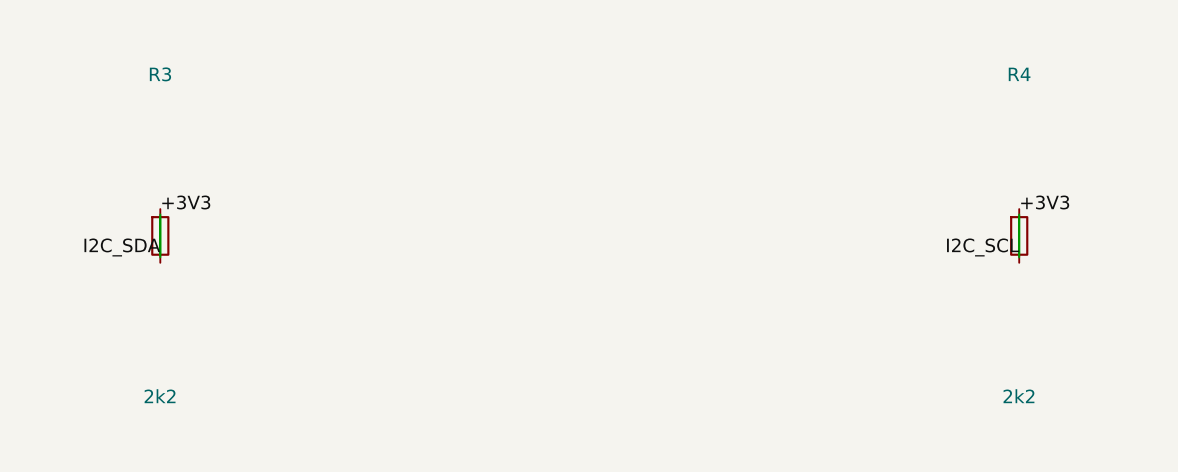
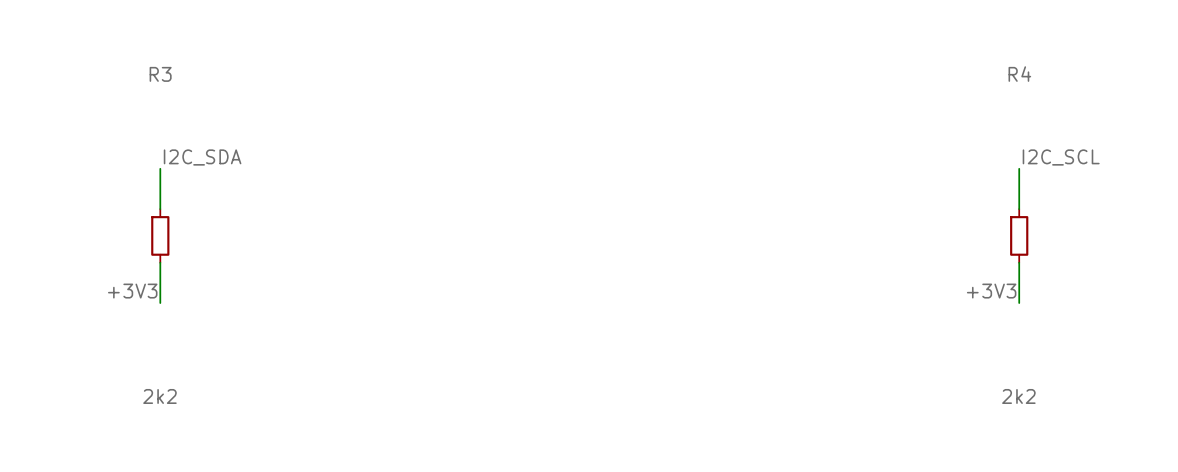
wire: none -> (160, 168) (160, 209)
wire: none -> (1019, 168) (1019, 209)
label position: +3V3 (186, 202) -> +3V3 (132, 291)
label position: +3V3 (1045, 202) -> +3V3 (991, 291)
wire: (160, 214) (160, 257) -> none
wire: (1019, 214) (1019, 257) -> none
label position: I2C_SDA (122, 247) -> I2C_SDA (202, 157)
label position: I2C_SCL (983, 247) -> I2C_SCL (1061, 157)
wire: none -> (160, 262) (160, 303)
wire: none -> (1019, 262) (1019, 303)

